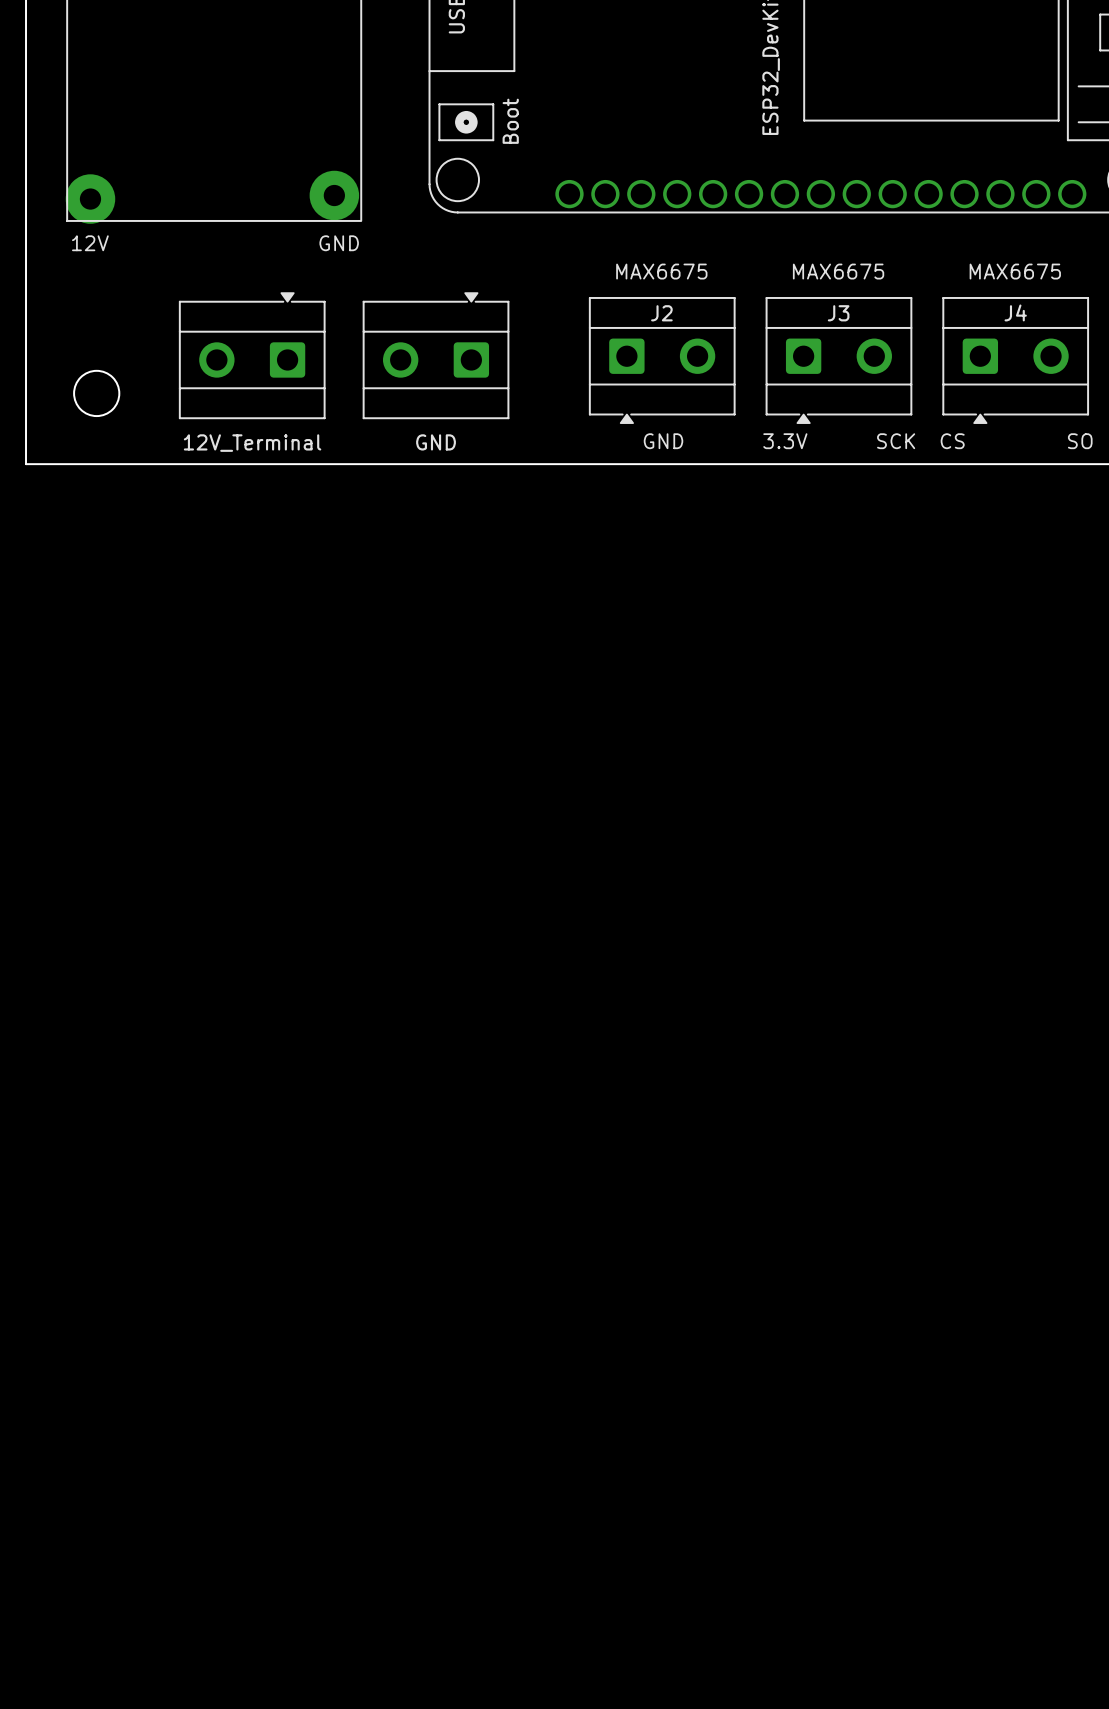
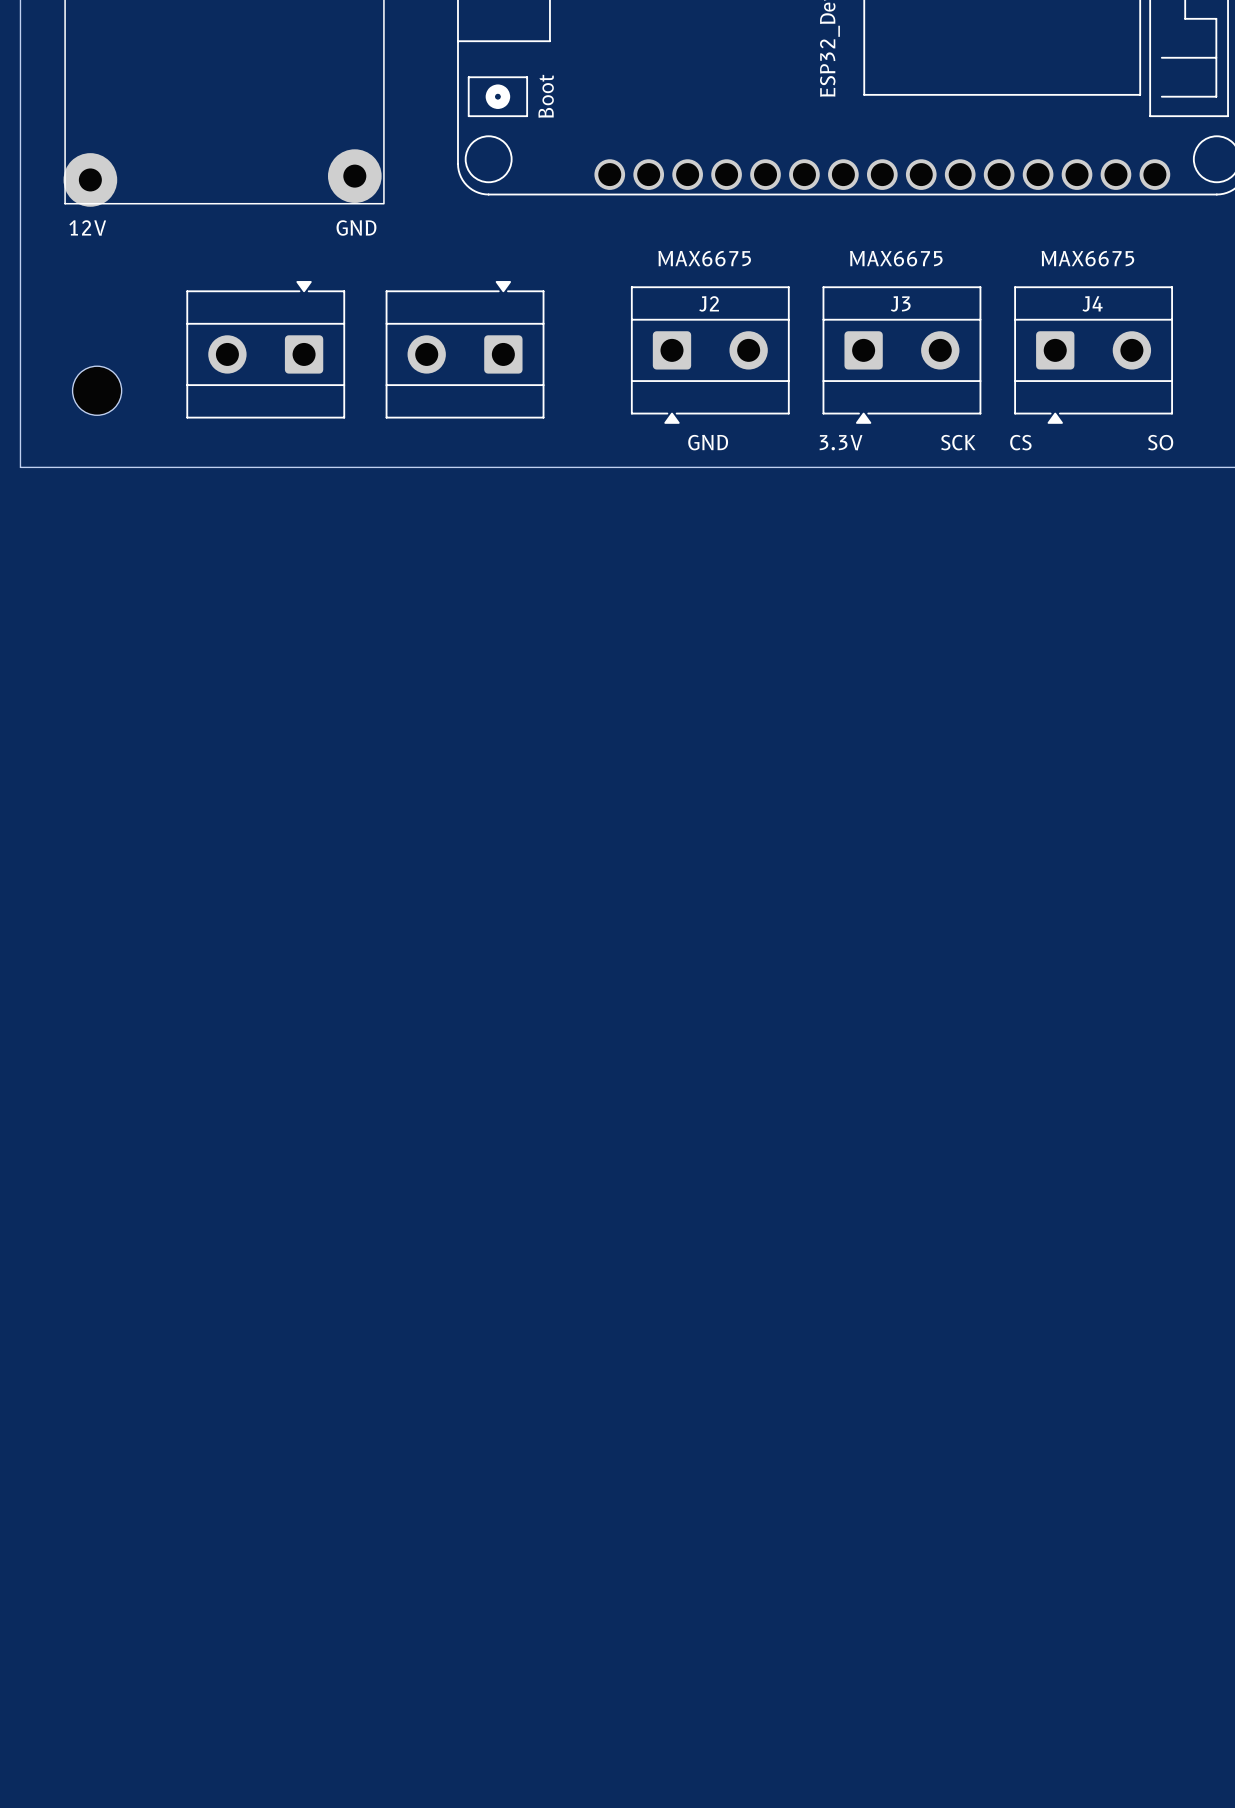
part text: GND (436, 442) -> none
part value: 12V_Terminal (252, 443) -> none

